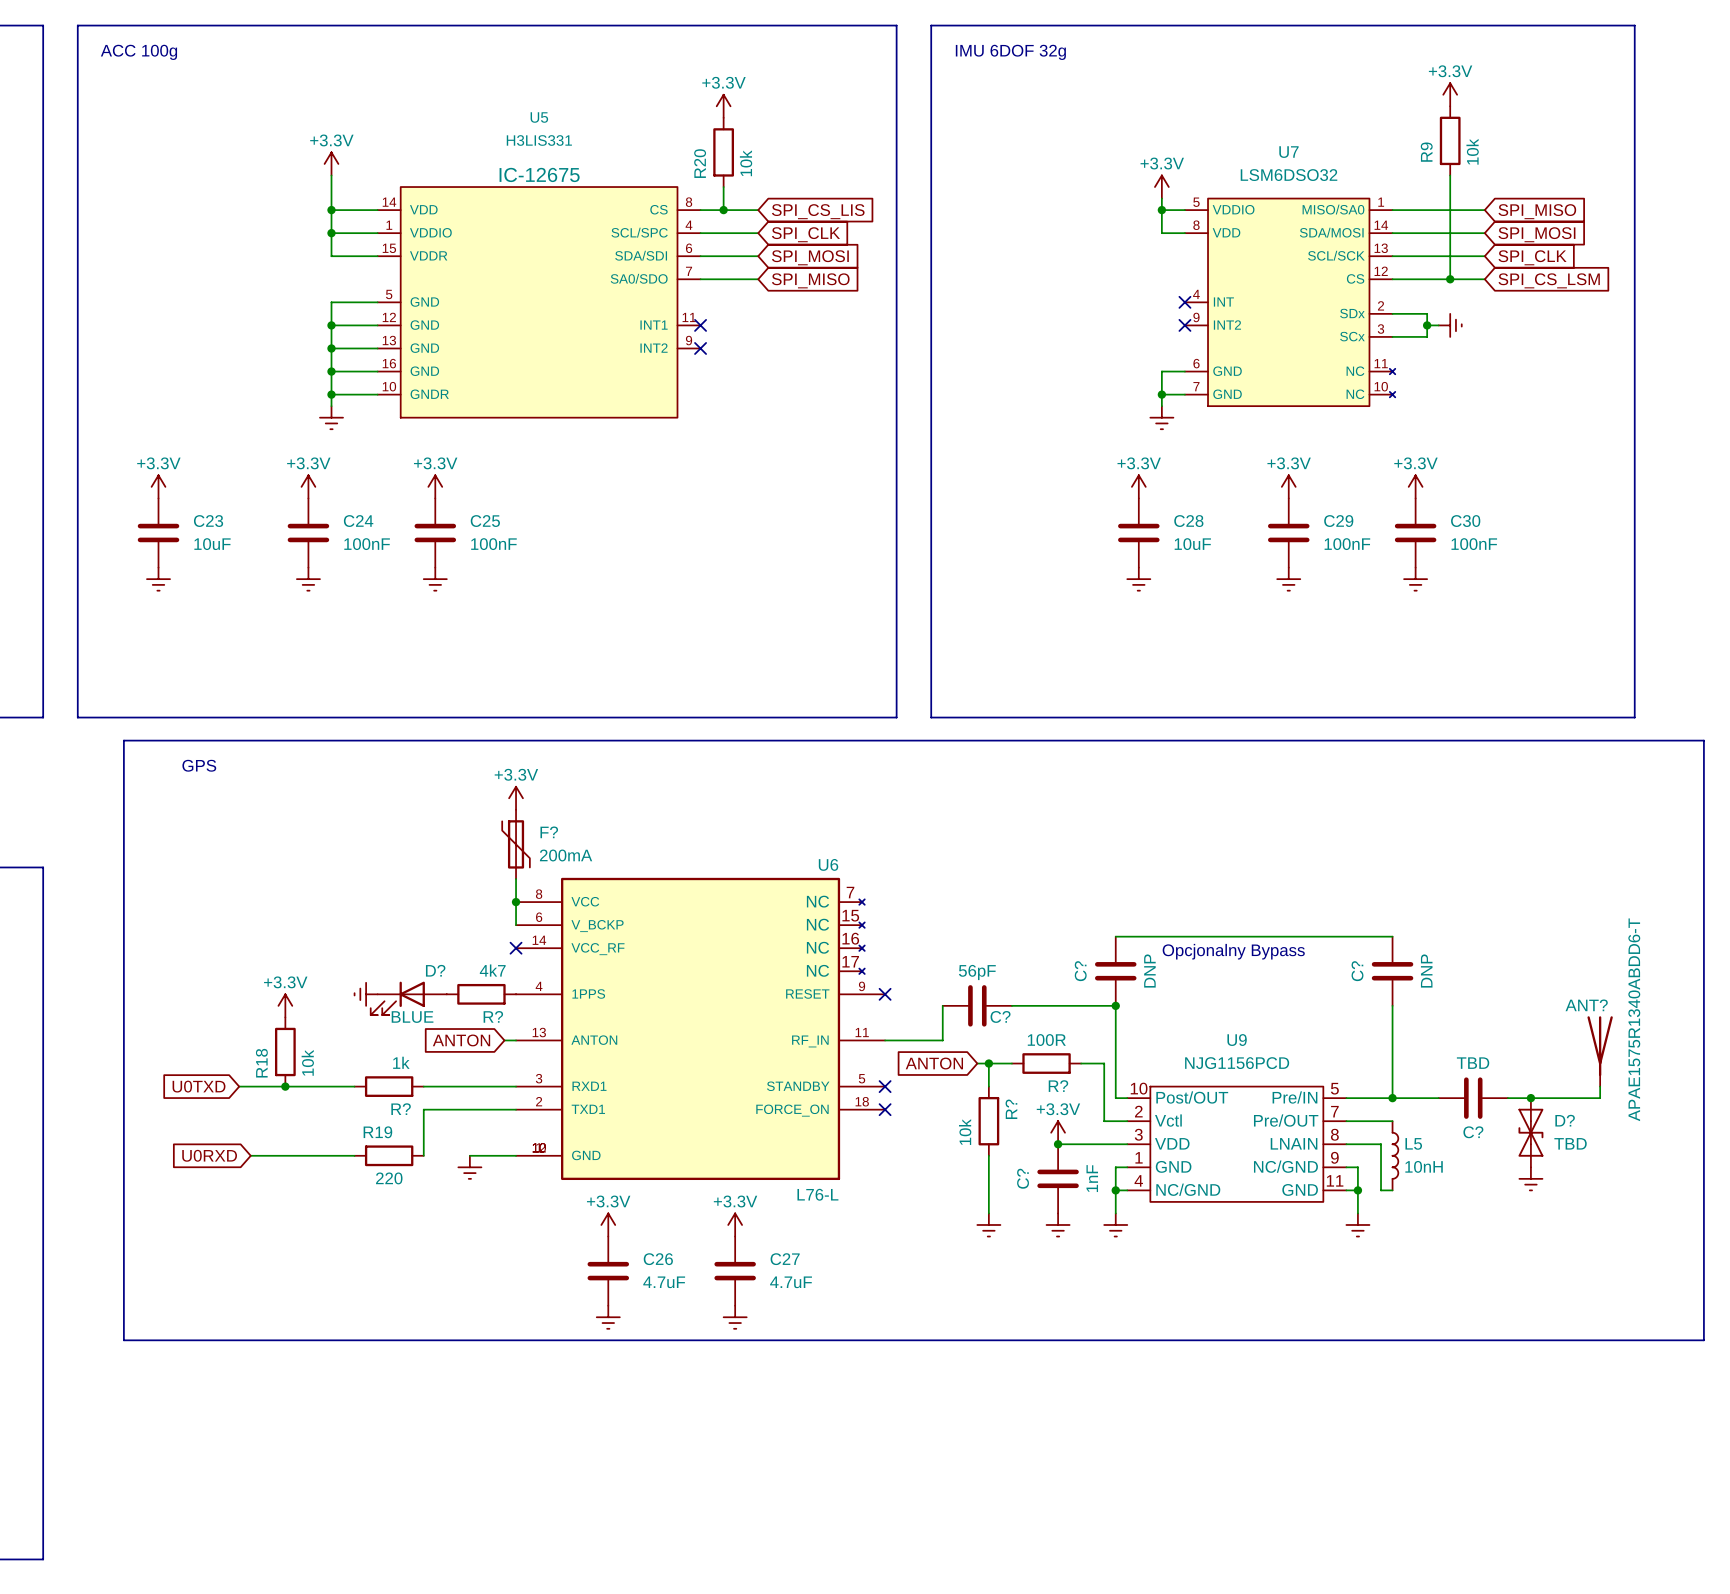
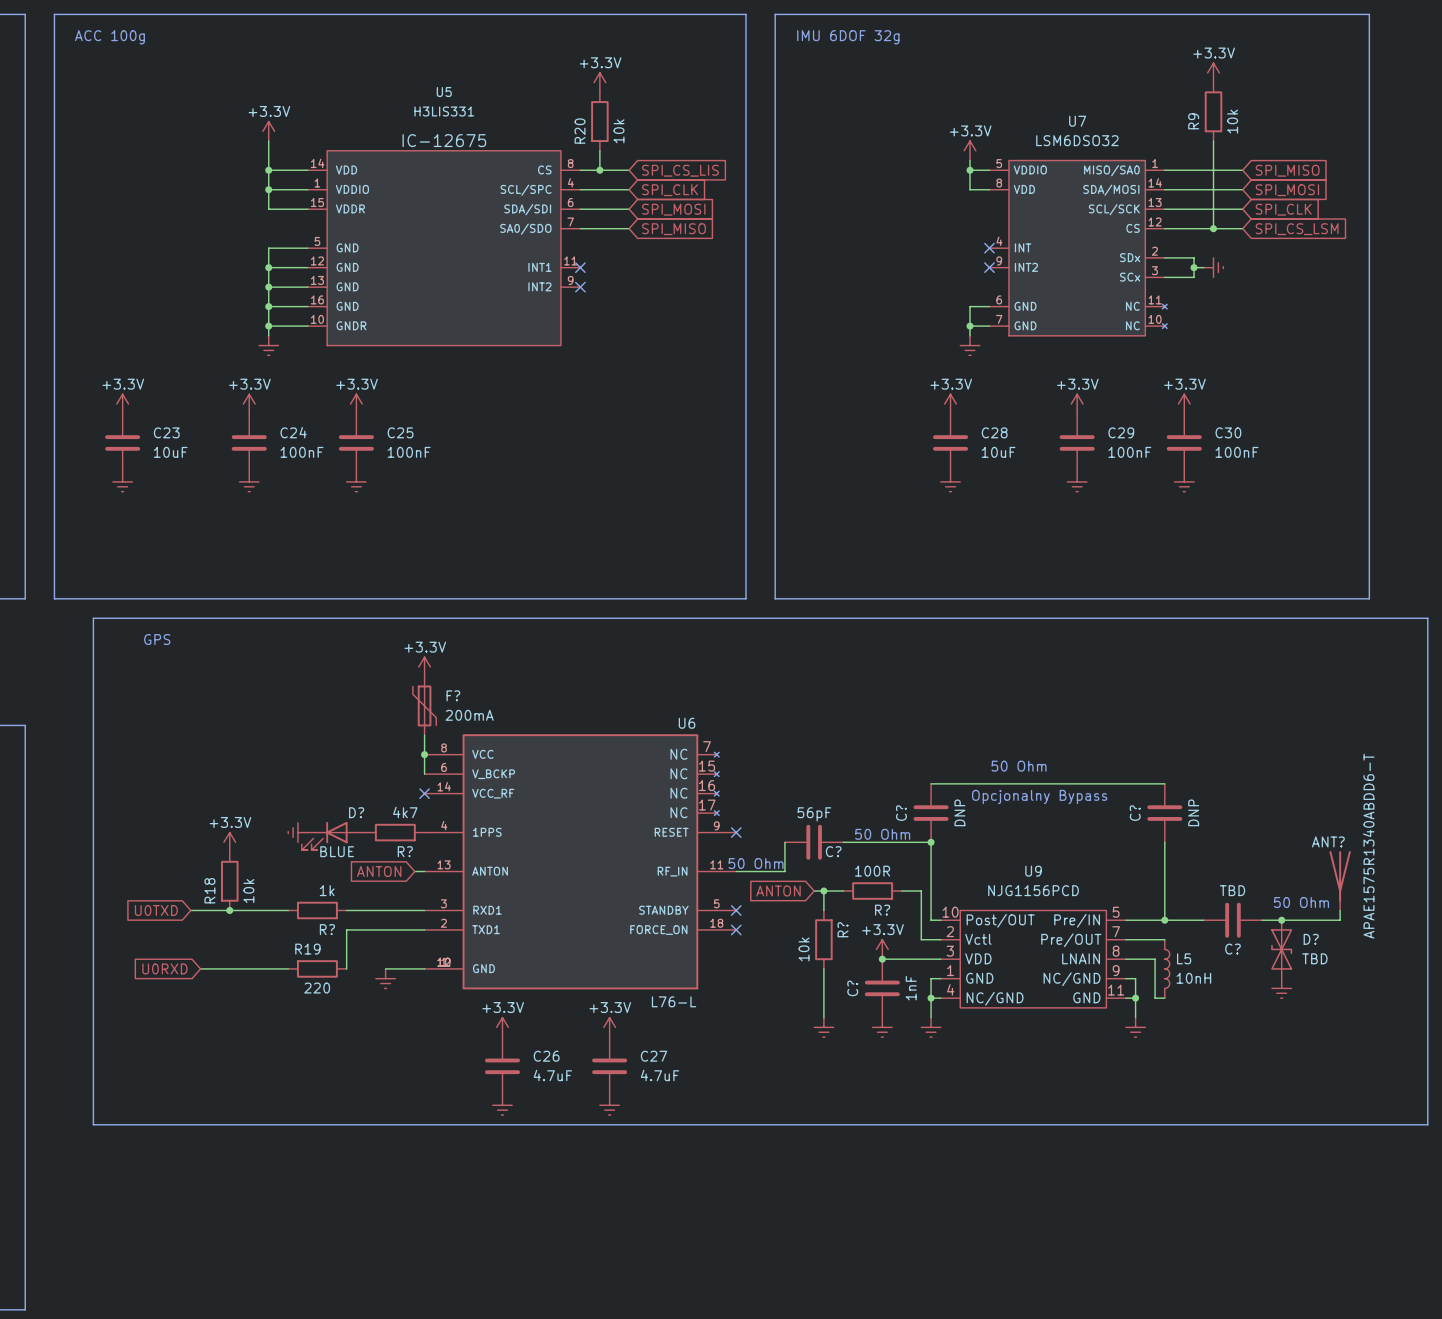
text: none -> 50 Ohm (1019, 766)
text: none -> 50 Ohm (882, 834)
text: none -> 50 Ohm (756, 863)
text: none -> 50 Ohm (1301, 902)

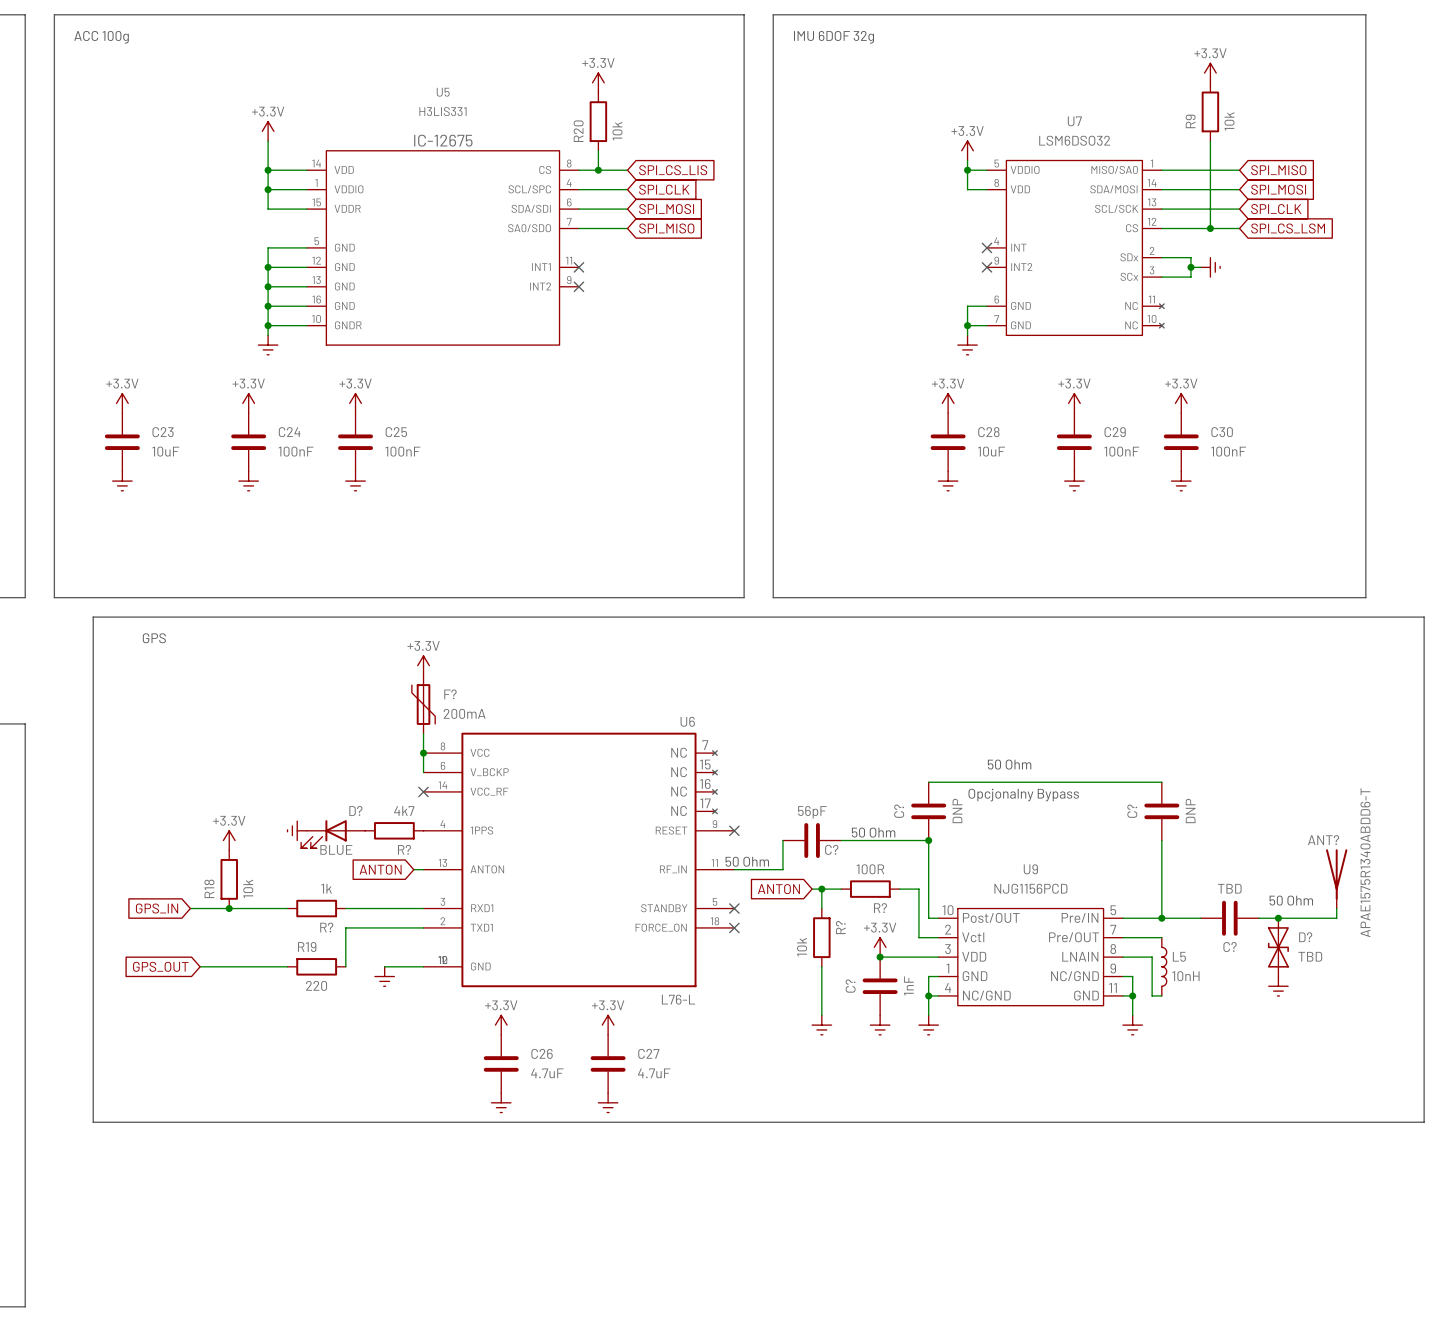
global label: U0TXD (156, 910) -> GPS_IN (157, 908)
global label: U0RXD (164, 968) -> GPS_OUT (160, 966)

